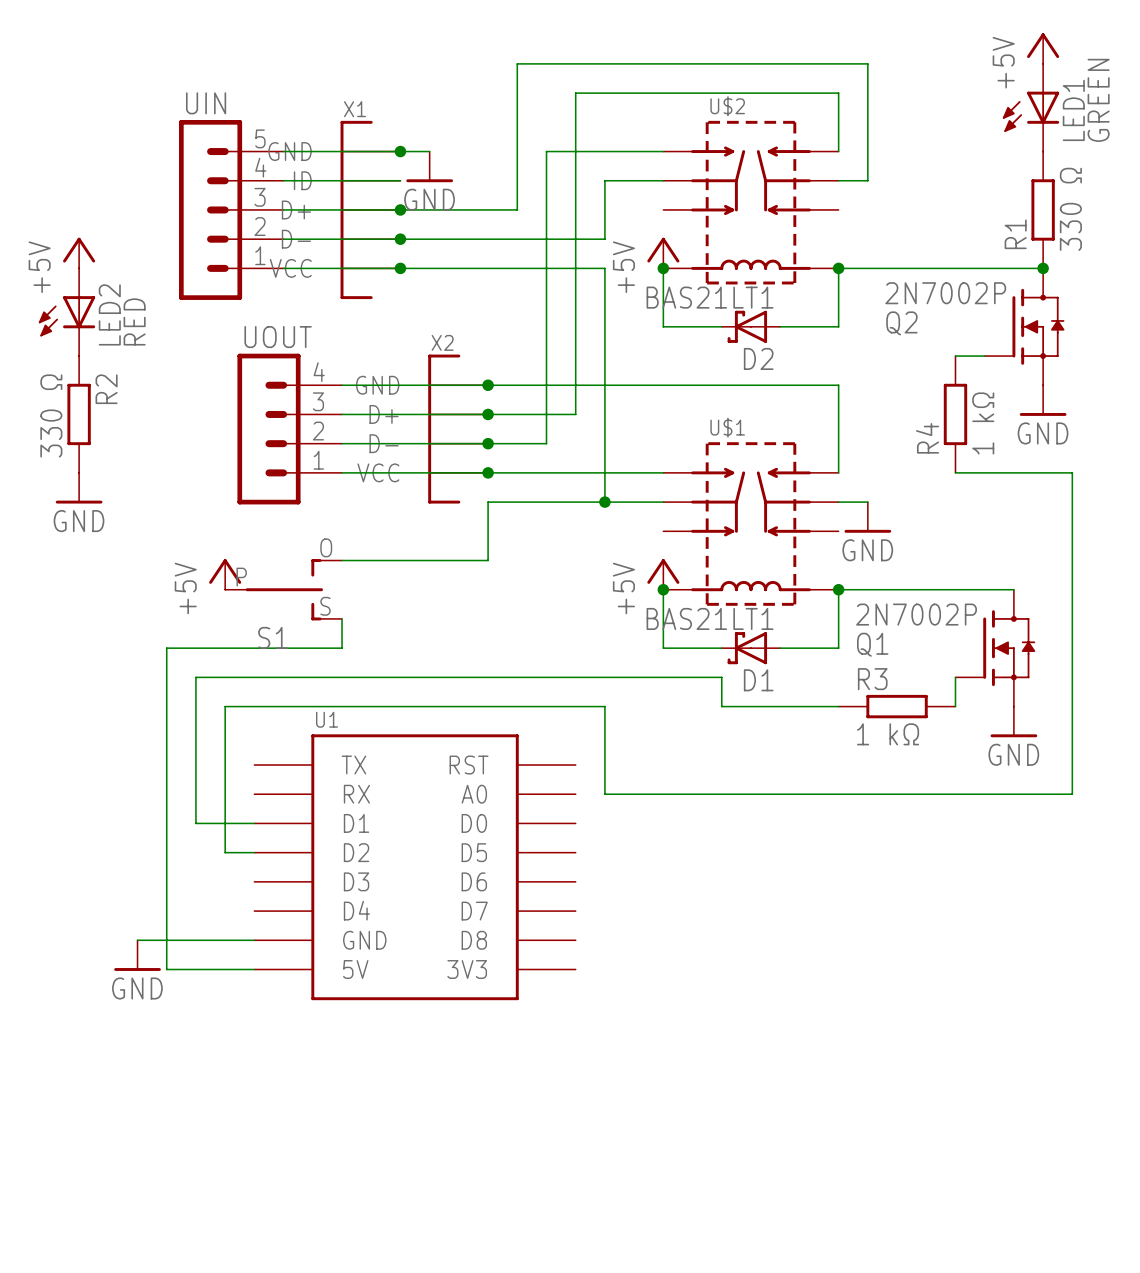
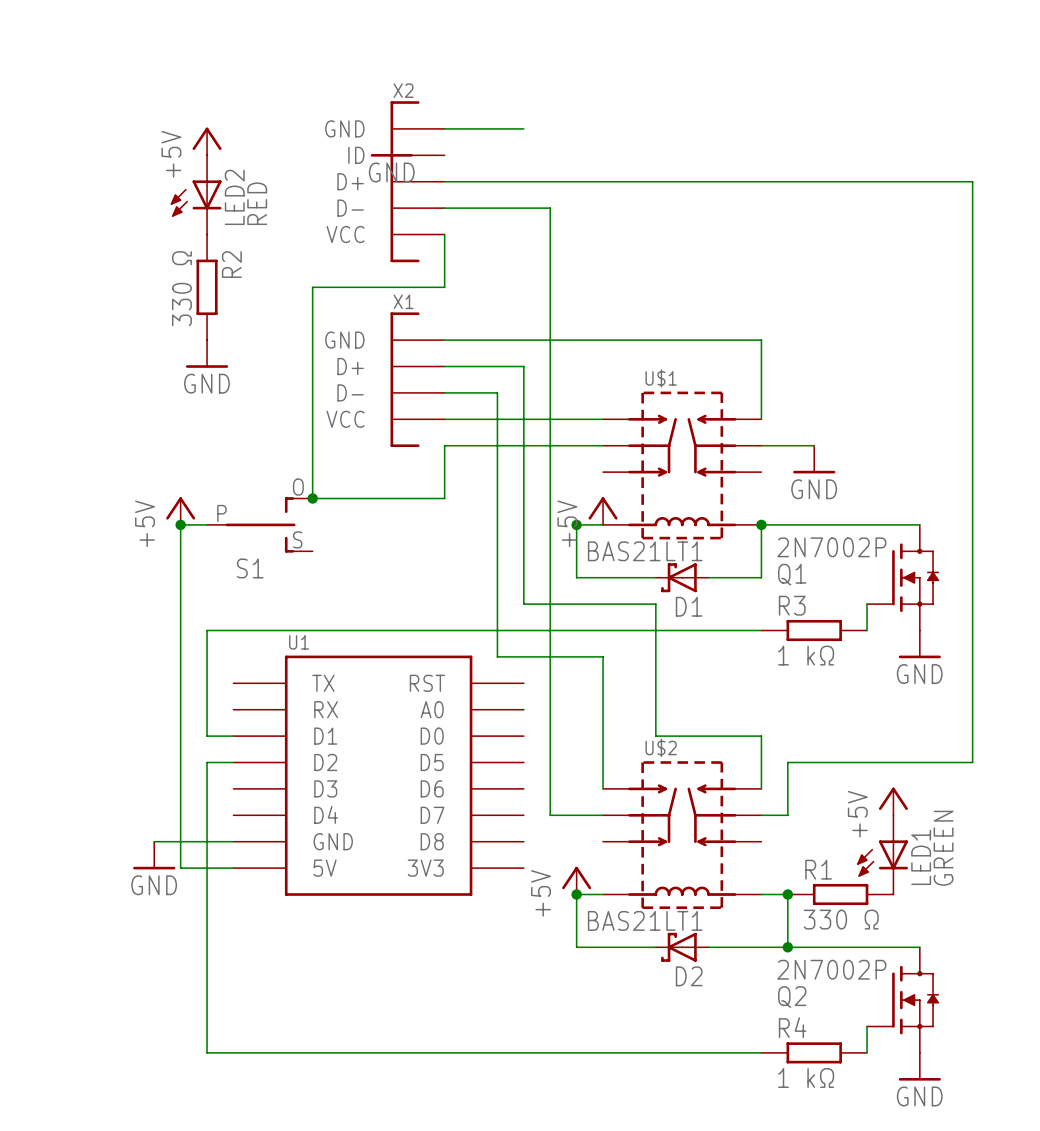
power symbol: +5V (1043, 48) -> none
LED1 position: (1031, 107) -> (882, 854)
wire: (283, 151) (429, 151) -> none
junction: (400, 151) -> none
wire: (546, 151) (546, 443) -> (497, 128) (444, 128)
wire: (575, 151) (663, 151) -> none
wire: (838, 151) (838, 93) (575, 93) (575, 414) -> (523, 604) (523, 366)
wire: (283, 180) (400, 180) -> none
wire: (663, 180) (604, 180) (604, 239) -> (550, 234) (550, 208)
wire: (838, 180) (867, 180) (867, 63) (517, 63) (517, 209) -> (972, 419) (972, 181) (471, 181)
U$2 position: (750, 202) -> (682, 835)
UIN: (231, 209) -> none
wire: (283, 209) (488, 209) -> none
X1: (370, 209) -> none
junction: (400, 209) -> none
X2: none -> (417, 181)
R1 rotation: 0° (1043, 209) -> 90° clockwise (840, 894)
R1 position: (1043, 209) -> (840, 894)
wire: (283, 239) (488, 239) -> none
junction: (400, 239) -> none
power symbol position: +5V (79, 253) -> +5V (207, 141)
power symbol: +5V (663, 253) -> none
wire: (283, 268) (604, 268) -> none
junction: (400, 268) -> none
wire: none -> (444, 234) (444, 287) (312, 287) (312, 498)
wire: (663, 268) (663, 326) (721, 326) -> none
junction: (663, 268) -> none
junction: (838, 268) -> none
wire: (1043, 268) (838, 268) (838, 326) (780, 326) -> none
junction: (1043, 268) -> none
LED2 position: (66, 312) -> (196, 194)
D2 position: (750, 326) -> (682, 947)
Q2 position: (1024, 326) -> (903, 1000)
X2 name: X2 (442, 342) -> X1 (403, 301)
wire: (955, 356) (984, 356) -> (787, 445) (814, 445)
wire: (342, 385) (488, 385) -> none
junction: (488, 385) -> none
power symbol: GND (1043, 400) -> none
R2 position: (79, 414) -> (207, 287)
wire: (342, 414) (488, 414) -> none
junction: (488, 414) -> none
R4 rotation: 0° (955, 414) -> 90° clockwise (814, 1052)
R4 position: (955, 414) -> (814, 1052)
UOUT: (289, 429) -> none
wire: (342, 443) (488, 443) -> none
junction: (488, 443) -> none
wire: none -> (497, 392) (497, 656) (603, 656) (603, 788)
wire: (342, 472) (488, 472) -> none
junction: (488, 472) -> none
wire: (955, 472) (1072, 472) -> none
power symbol position: GND (79, 488) -> GND (207, 353)
wire: none -> (550, 445) (550, 630) (655, 630) (655, 736) (761, 736) (761, 788)
junction: (604, 502) -> none
power symbol position: GND (867, 517) -> GND (814, 459)
junction: none -> (312, 498)
power symbol position: +5V (225, 574) -> +5V (180, 511)
junction: none -> (180, 524)
wire: (663, 589) (663, 648) -> (603, 524) (576, 524) (576, 577) (603, 577)
junction position: (663, 589) -> (576, 524)
wire: (342, 618) (342, 648) (166, 648) (166, 969) (195, 969) -> none
wire: (195, 677) (575, 677) -> (180, 604) (180, 524) (207, 524)
wire: (604, 794) (1072, 794) -> (761, 815) (787, 815) (787, 762) (972, 762) (972, 709)
wire: none -> (550, 709) (550, 815) (603, 815)
wire: (195, 823) (225, 823) (225, 852) -> (180, 736) (180, 868)
wire: none -> (207, 762) (207, 1052) (761, 1052)
power symbol: none -> +5V (893, 801)
wire: (137, 940) (166, 940) -> none
power symbol position: GND (137, 955) -> GND (154, 855)
power symbol: none -> +5V (576, 880)
junction: none -> (576, 894)
wire: none -> (603, 894) (576, 894) (576, 947) (655, 947)
wire: none -> (761, 894) (787, 894) (787, 947)
junction: none -> (787, 894)
wire: none -> (708, 947) (919, 947)
junction: none -> (787, 947)
wire: none -> (867, 1026) (867, 1052)
power symbol: none -> GND (919, 1066)

